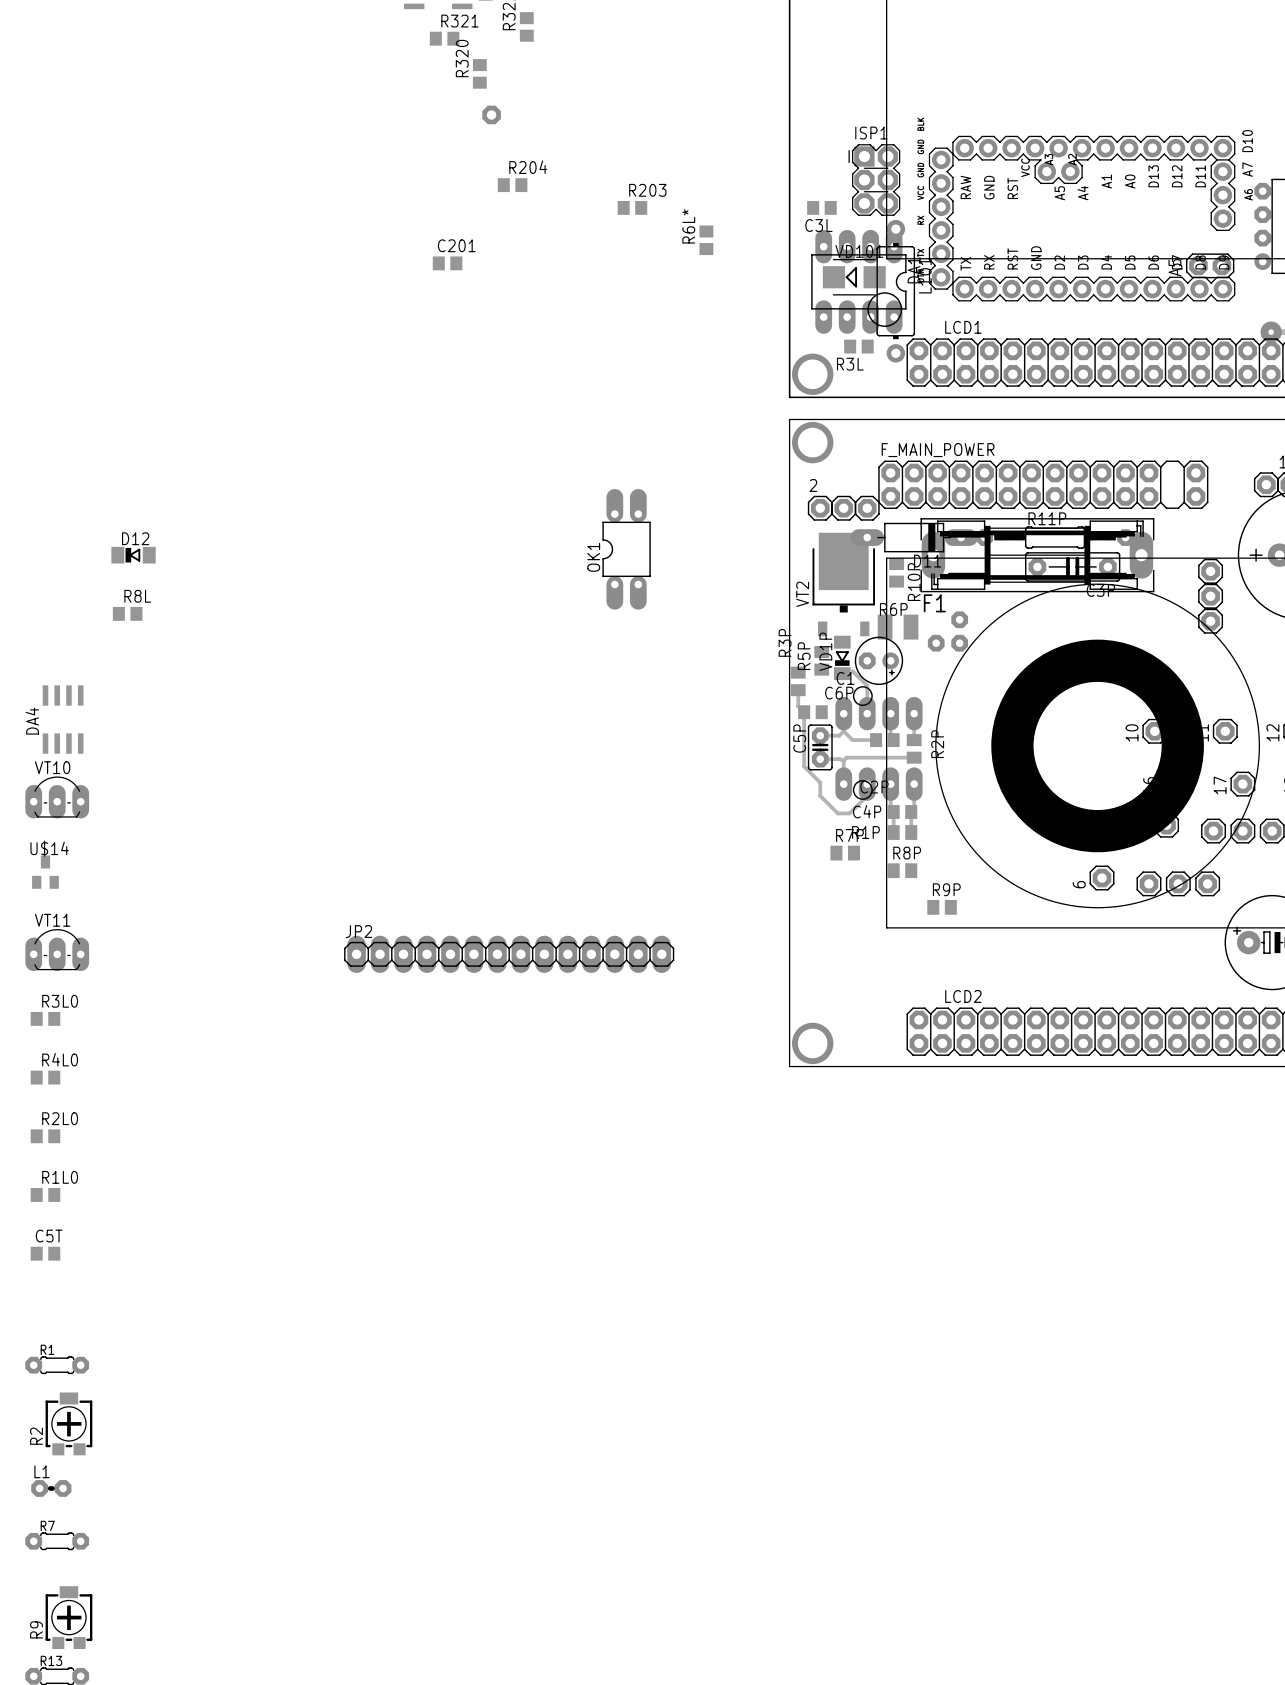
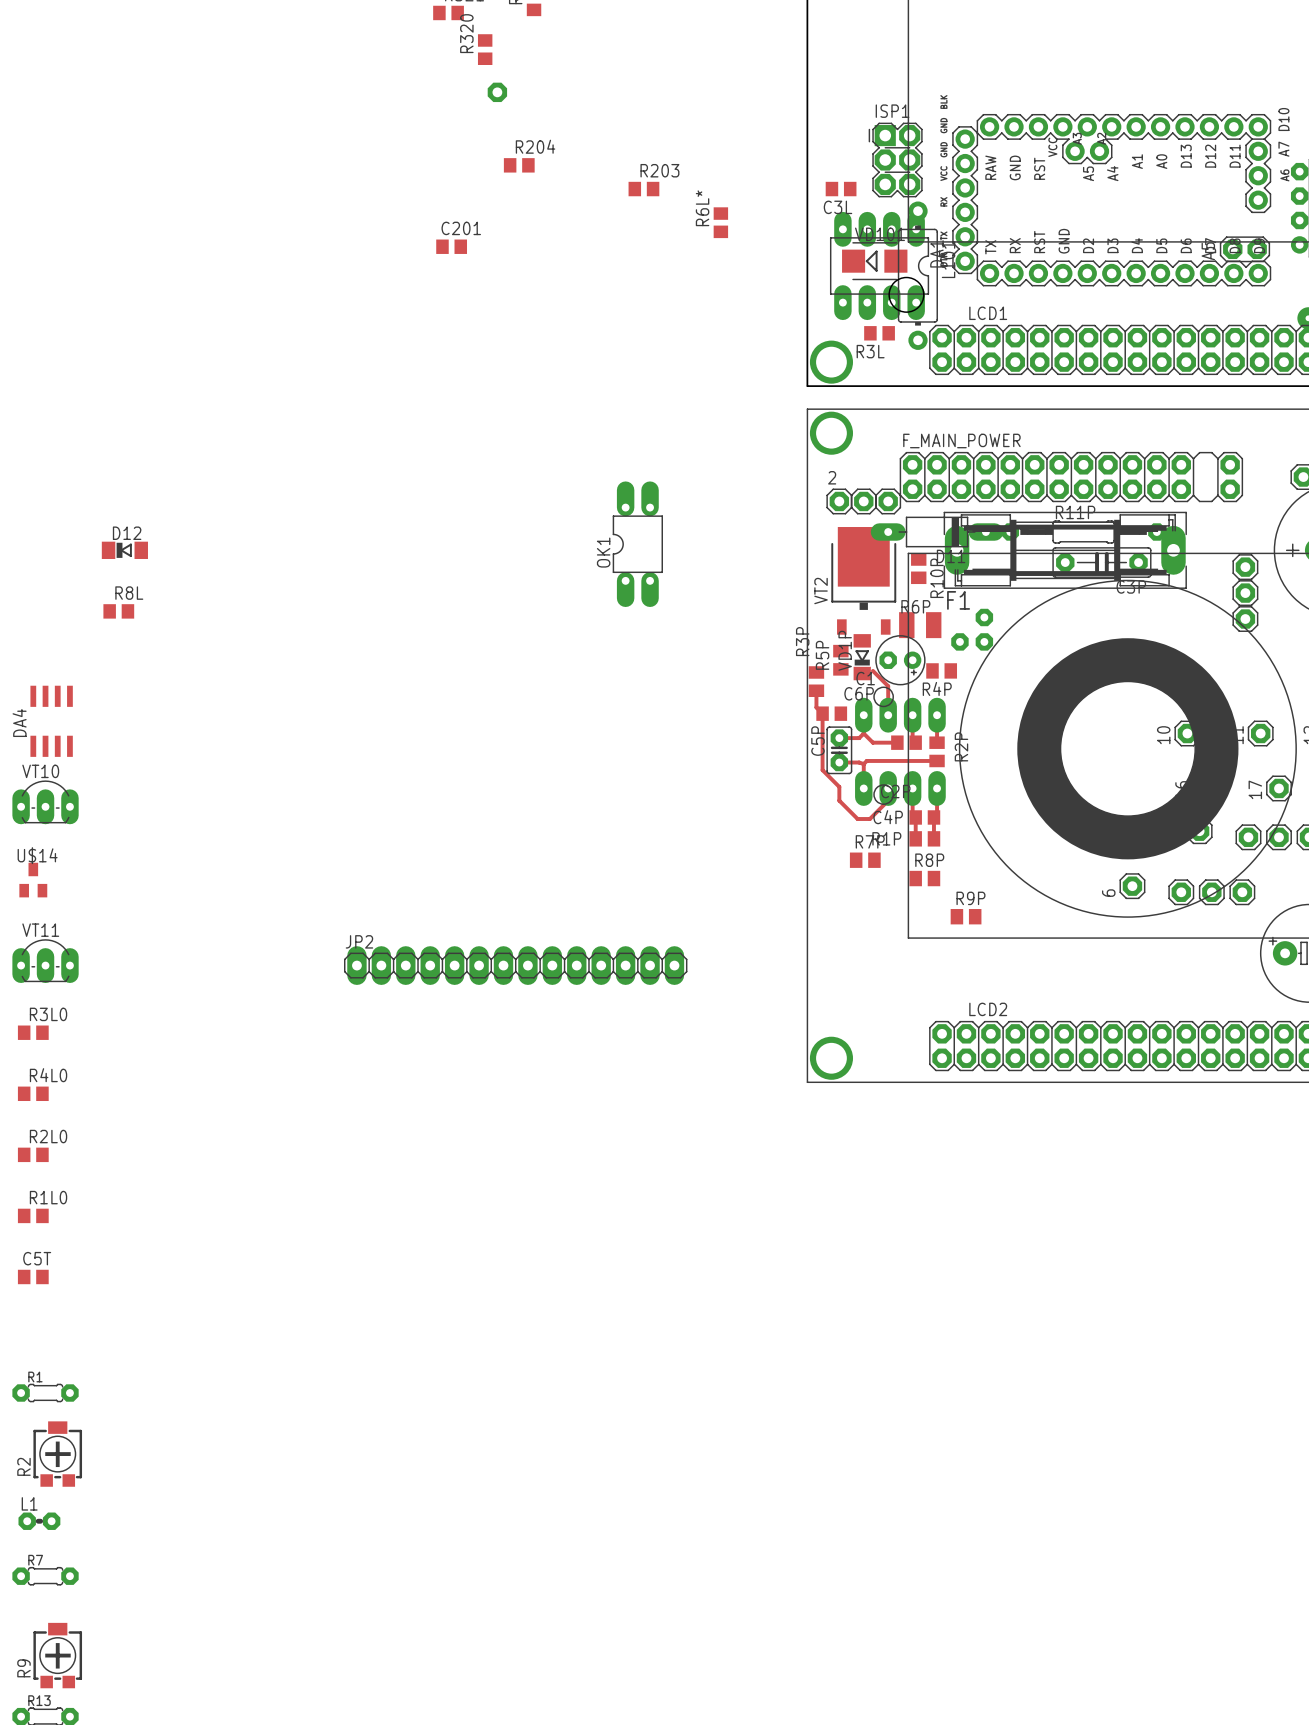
R4P: none -> (941, 670)

